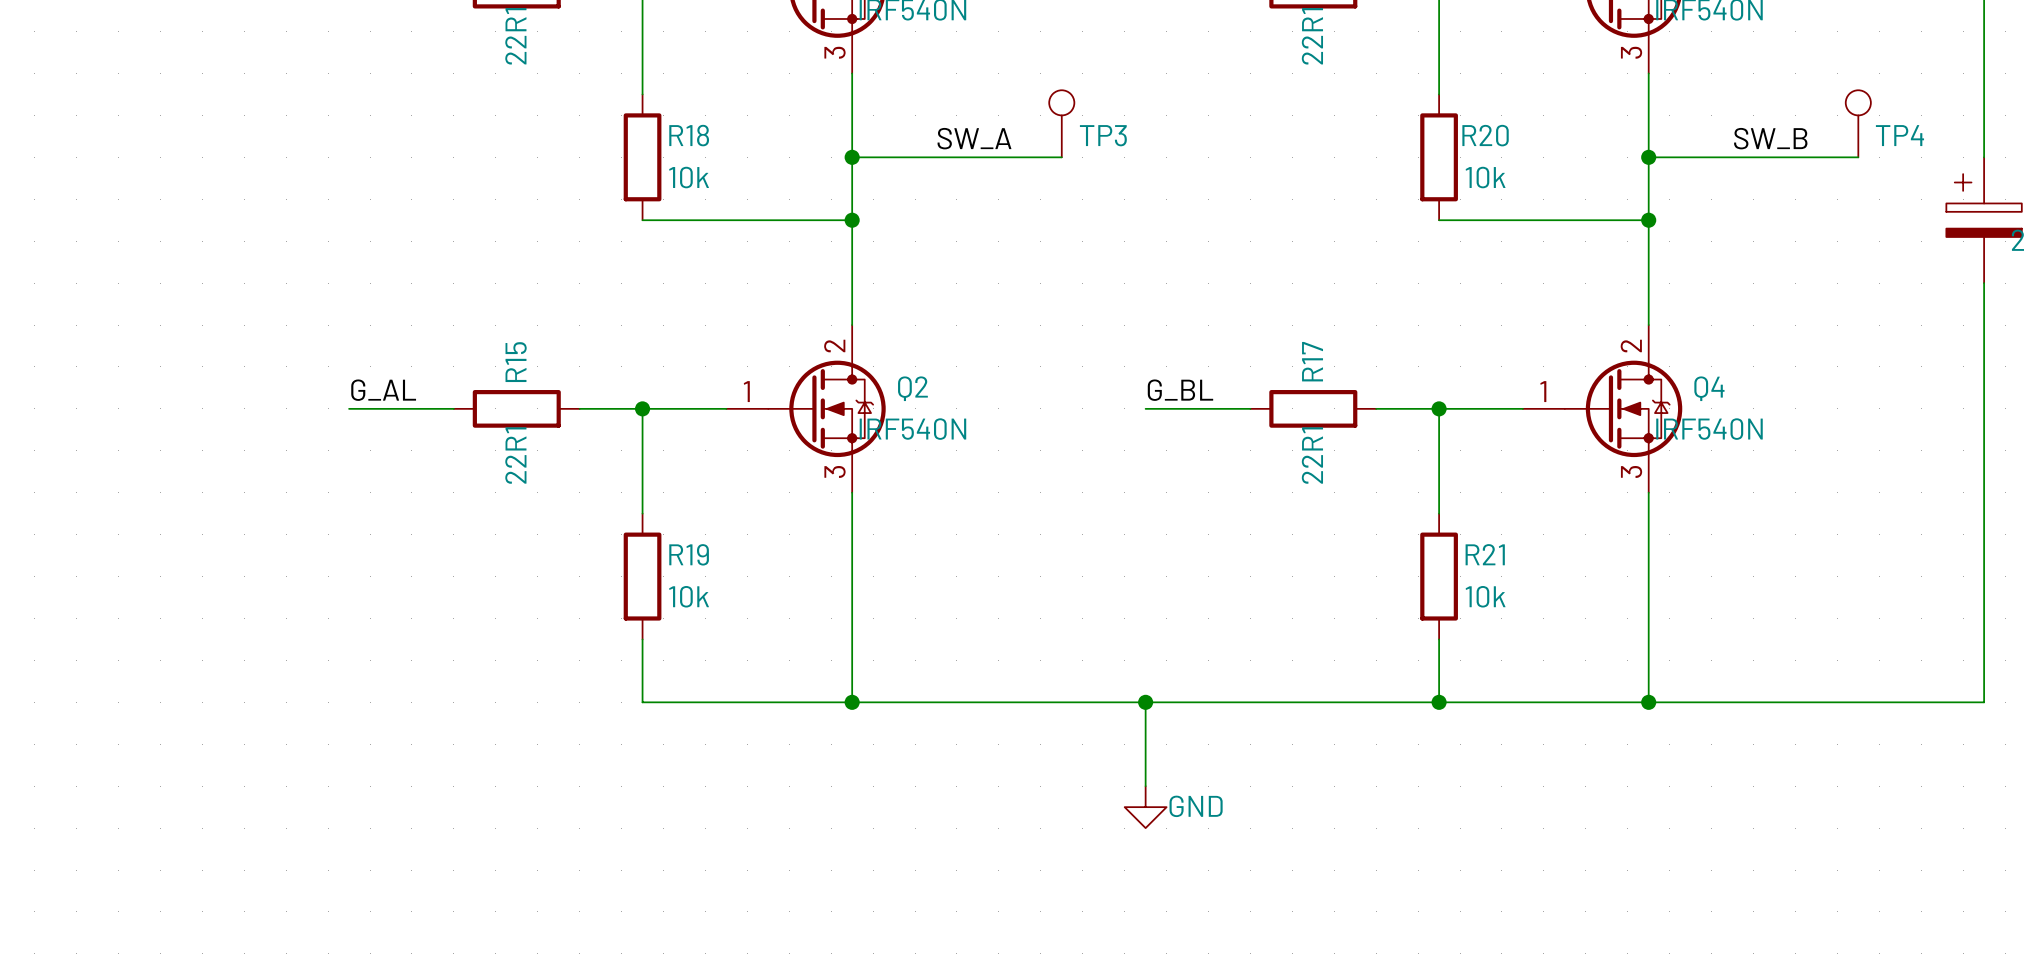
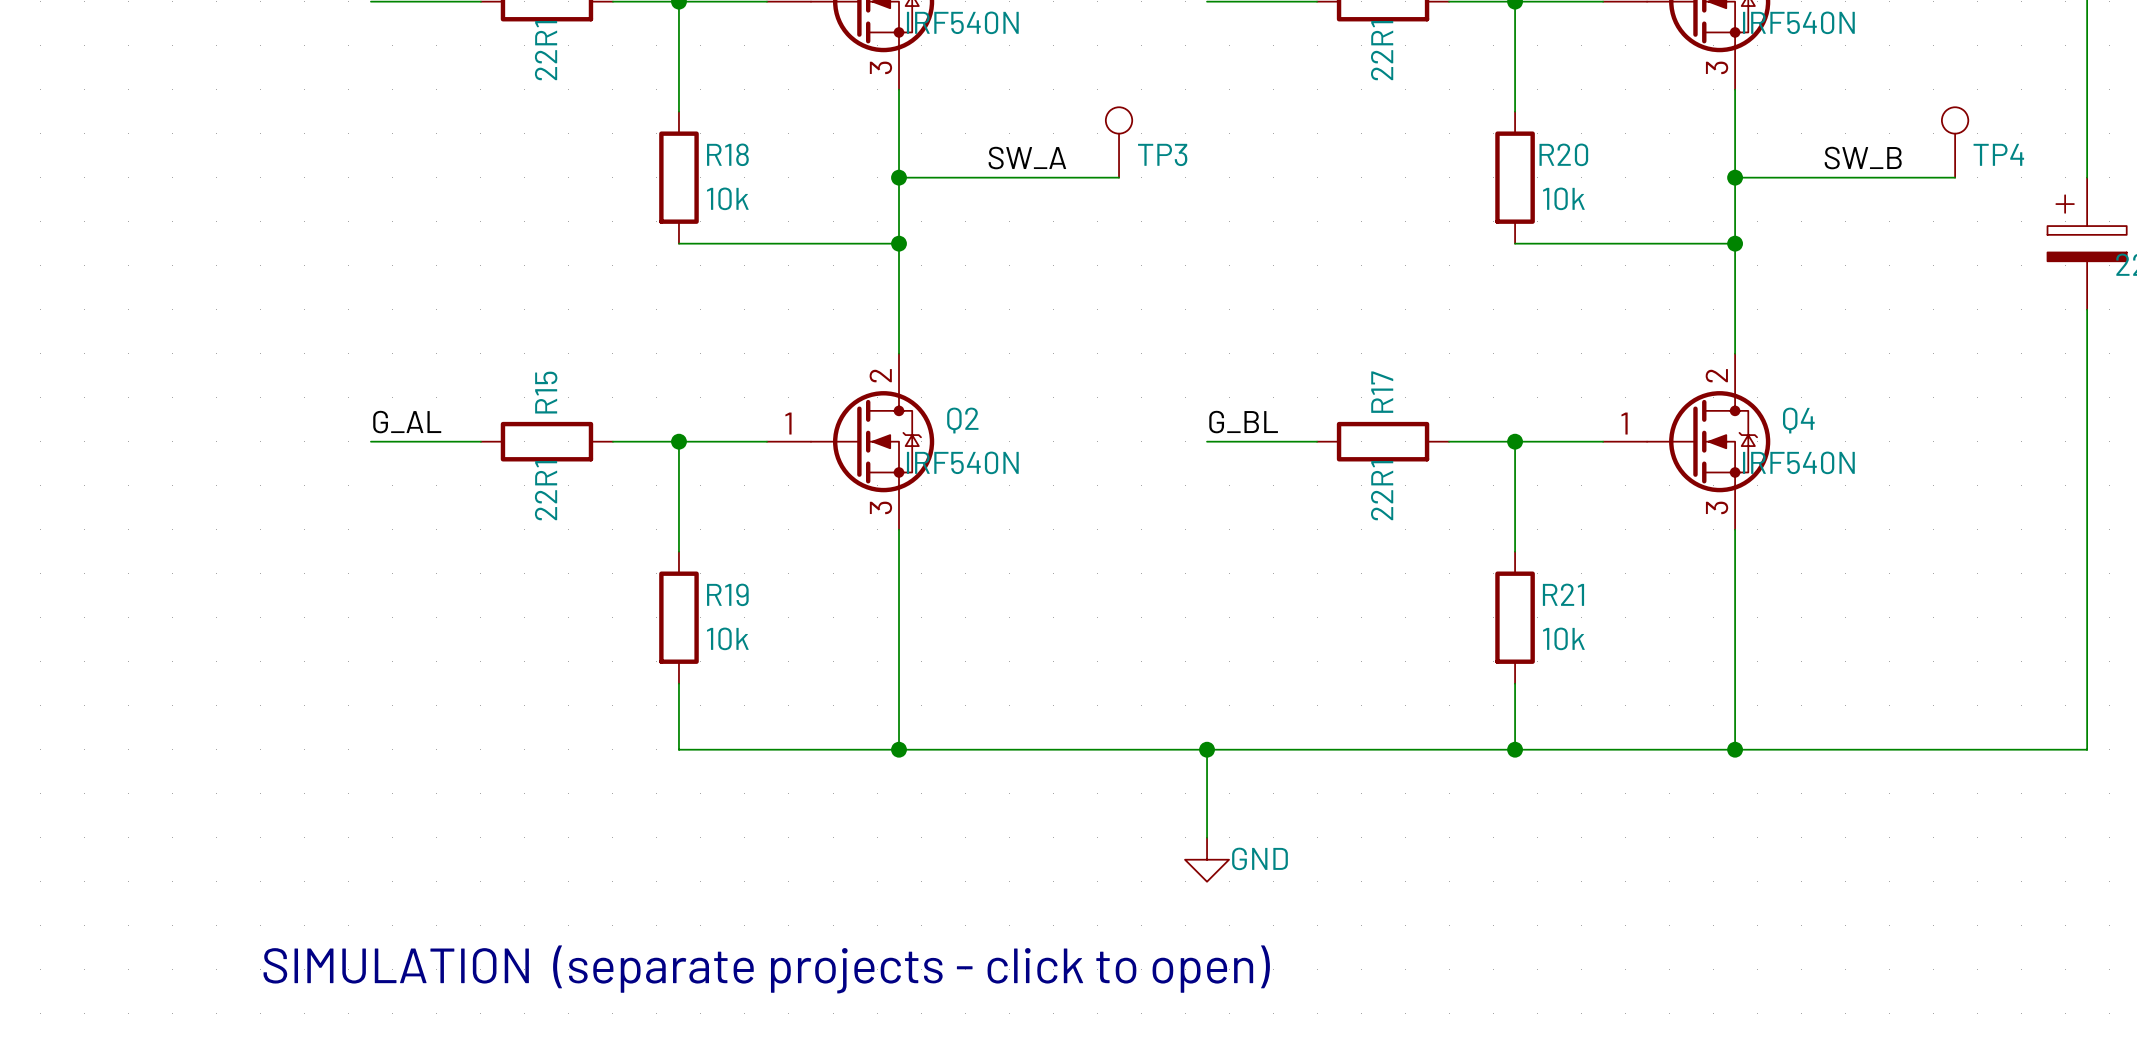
text: none -> SIMULATION (separate projects - click to open) (766, 969)

